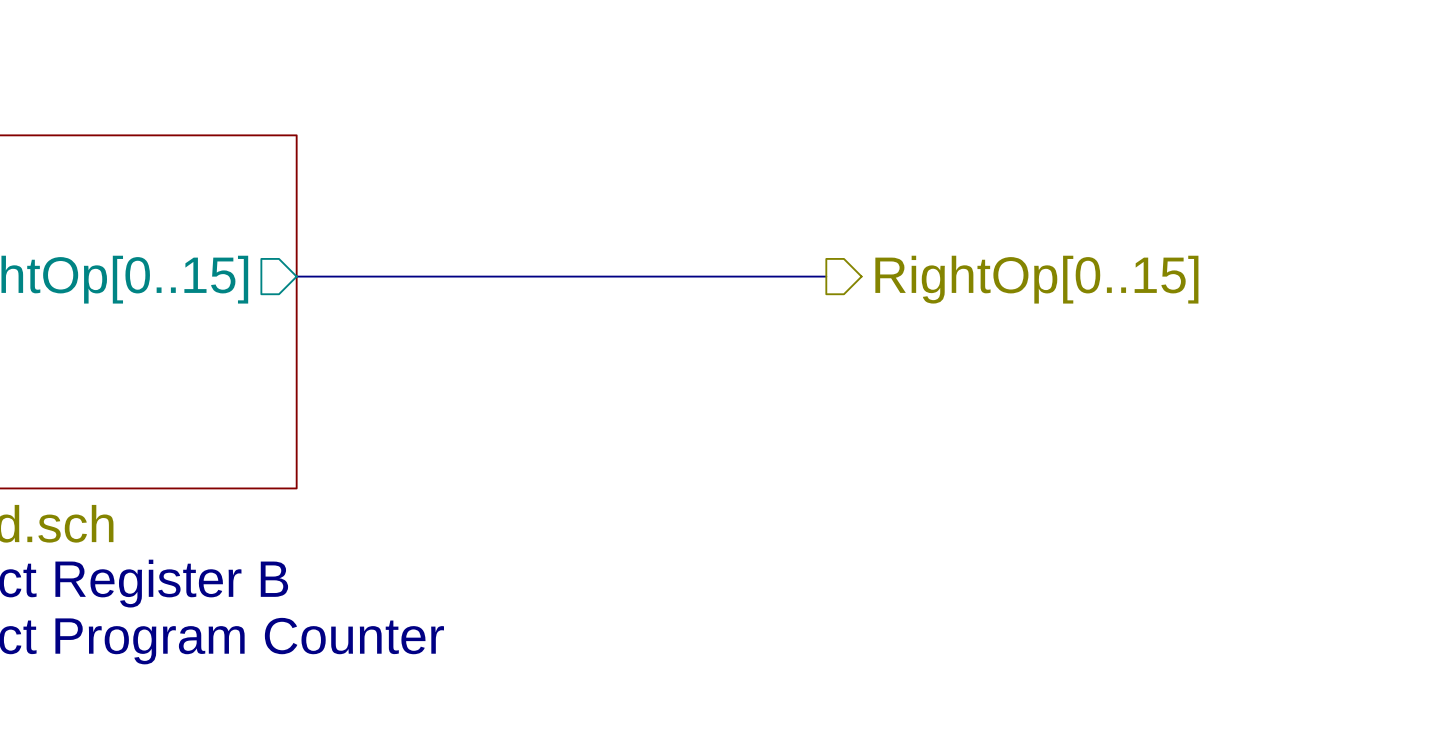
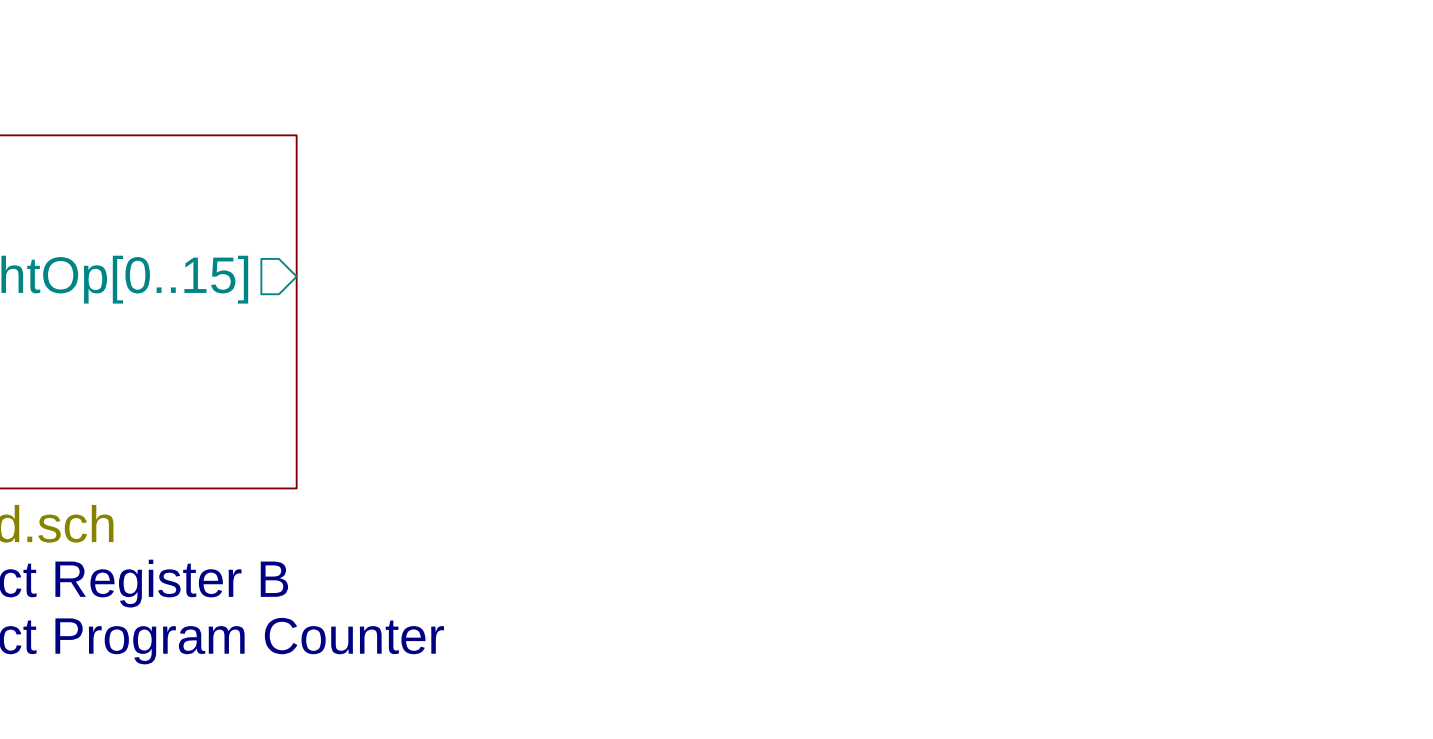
bus: (296, 276) (826, 276) -> none
hierarchical label: RightOp[0..15] (1036, 279) -> none

